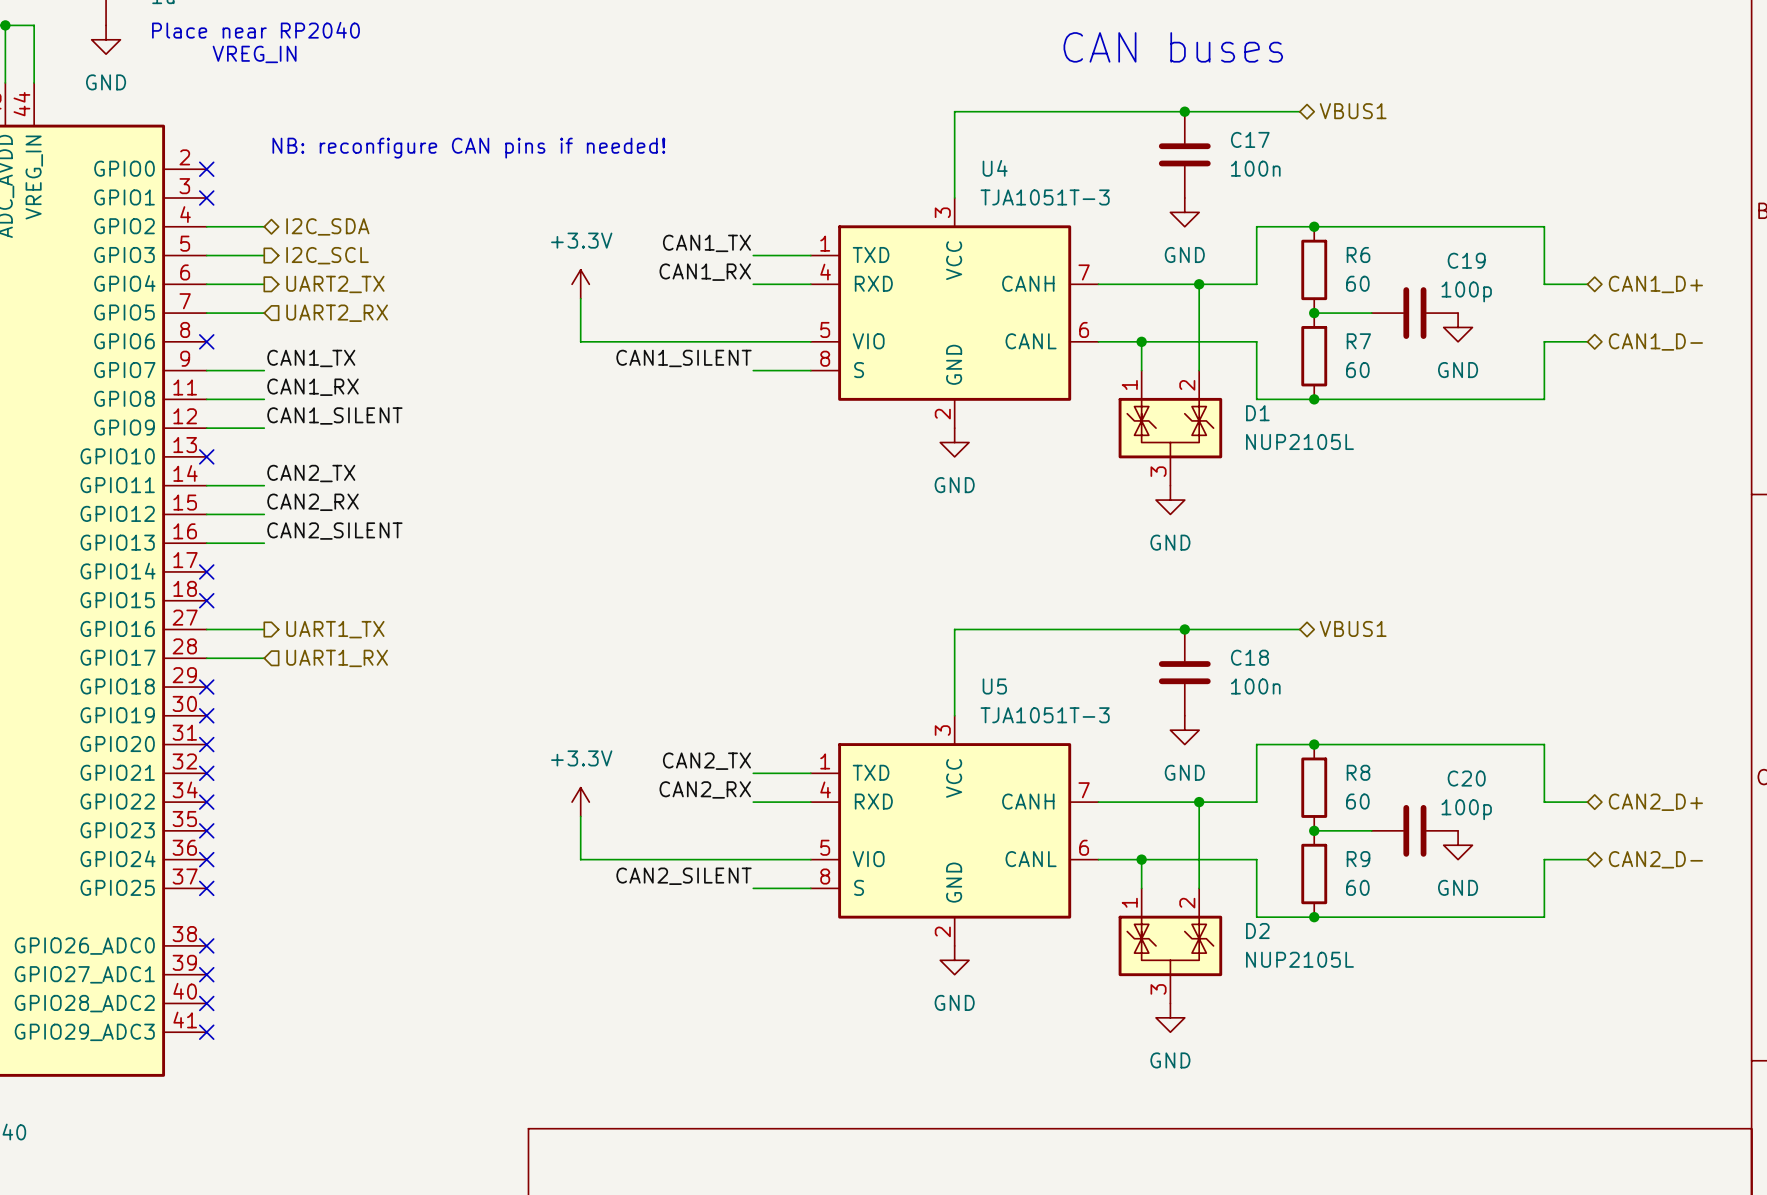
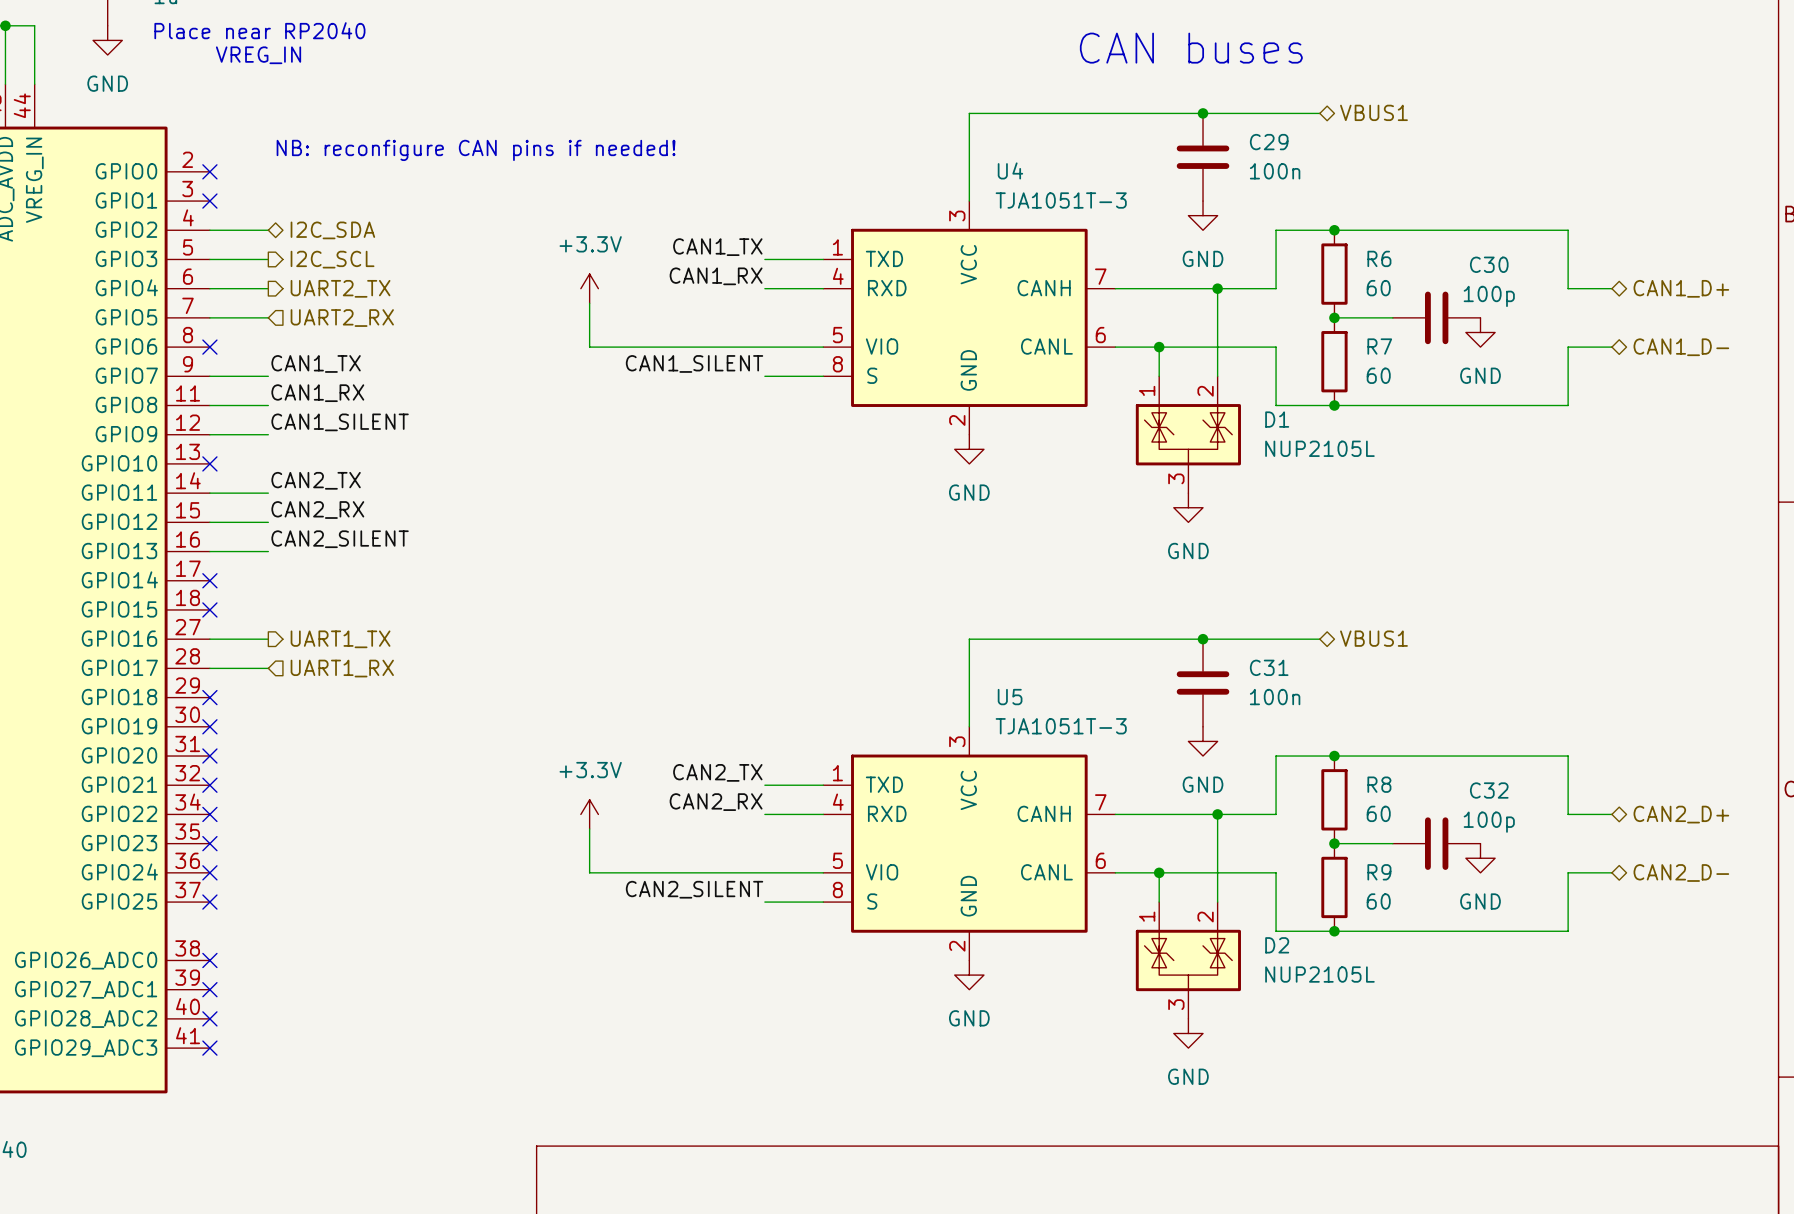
C17 name: C17 (1250, 139) -> C29 (1269, 142)
C19 name: C19 (1466, 260) -> C30 (1489, 264)
C18 name: C18 (1249, 657) -> C31 (1269, 667)
C20 name: C20 (1466, 778) -> C32 (1489, 790)

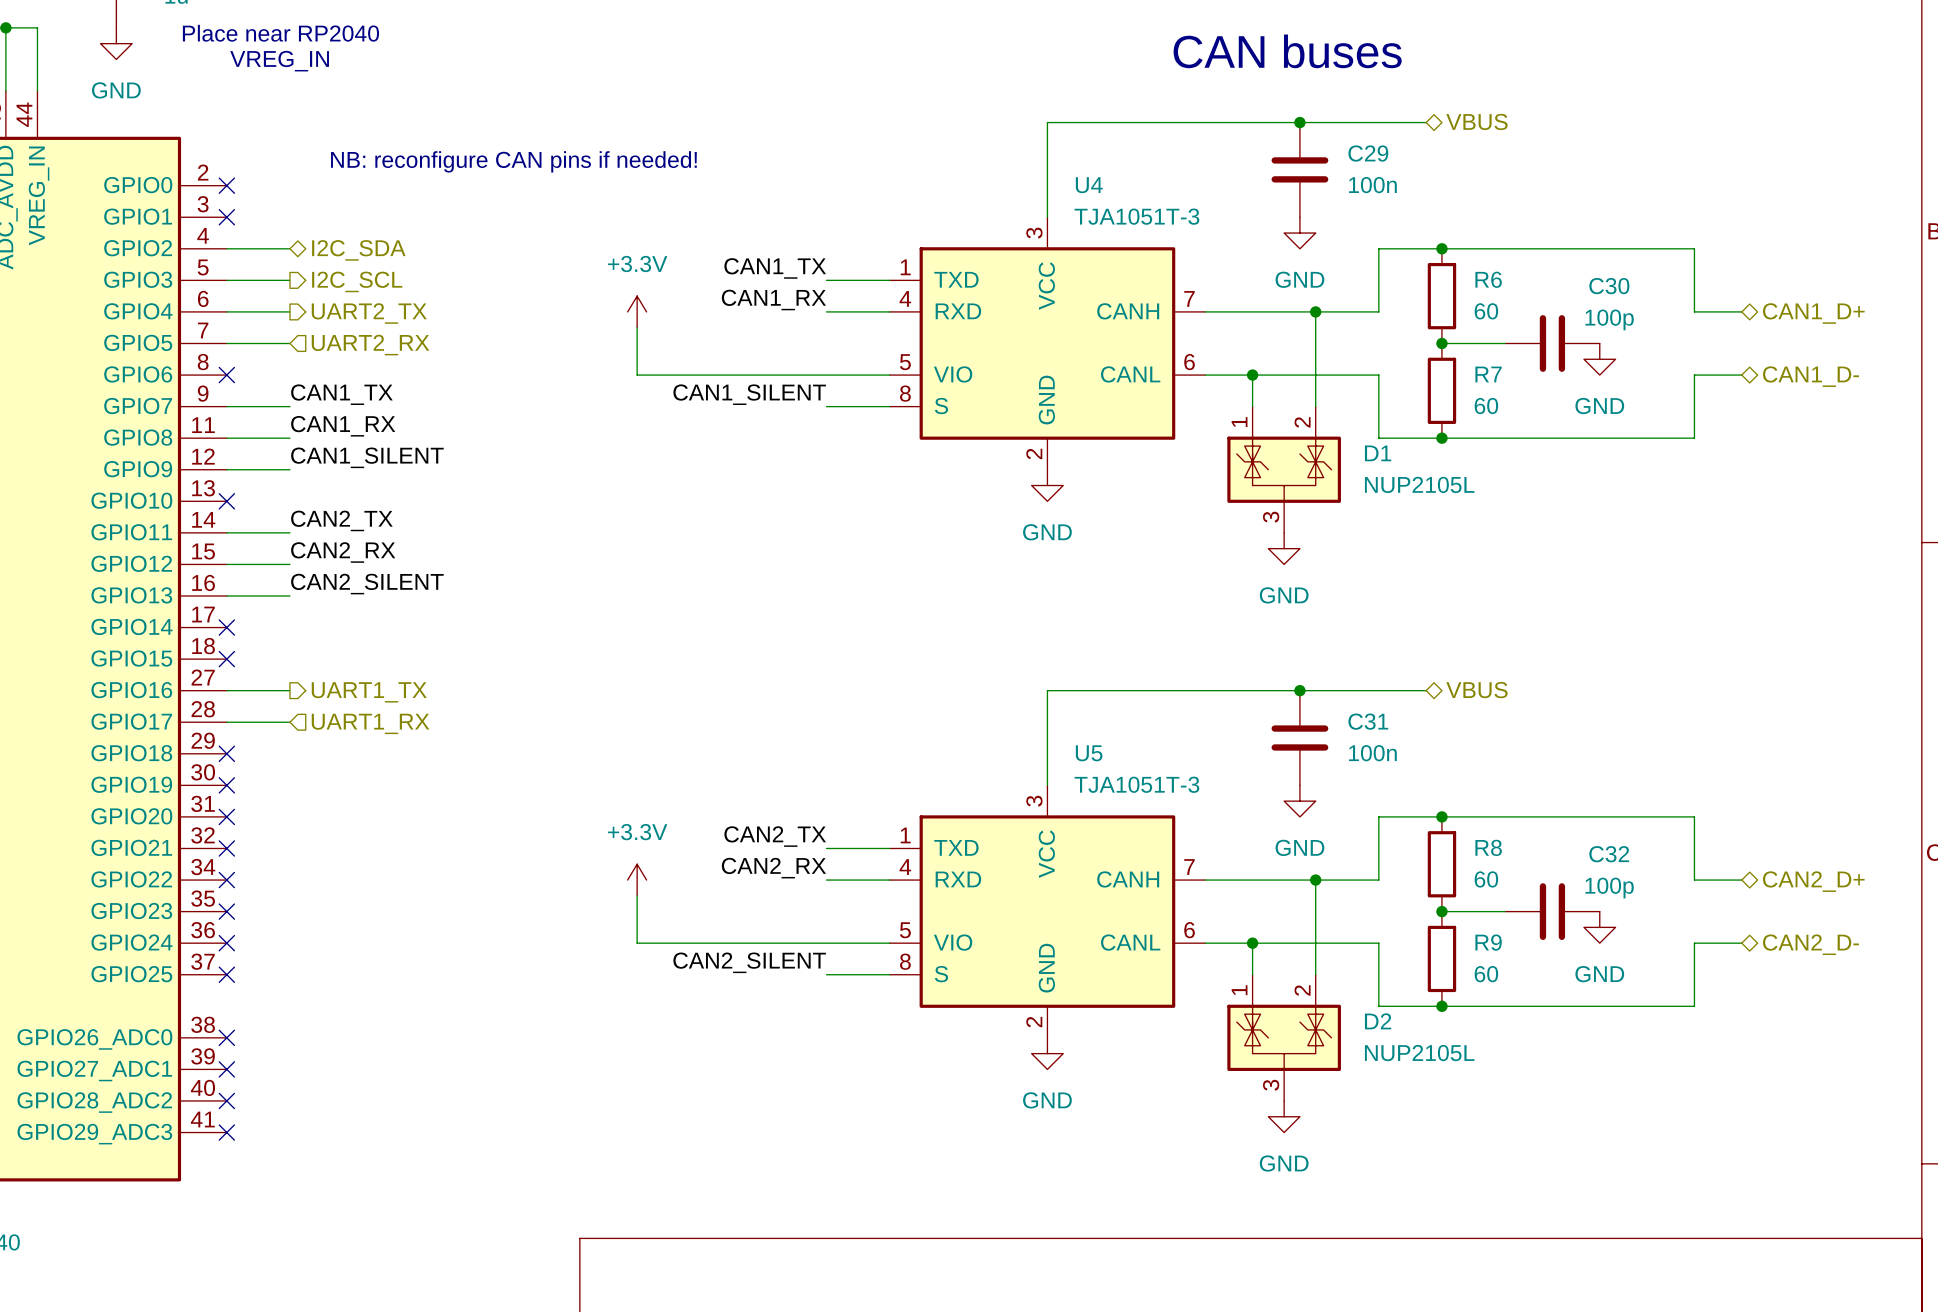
hierarchical label: VBUS1 (1373, 112) -> VBUS (1476, 121)
hierarchical label: VBUS1 (1373, 638) -> VBUS (1476, 690)

